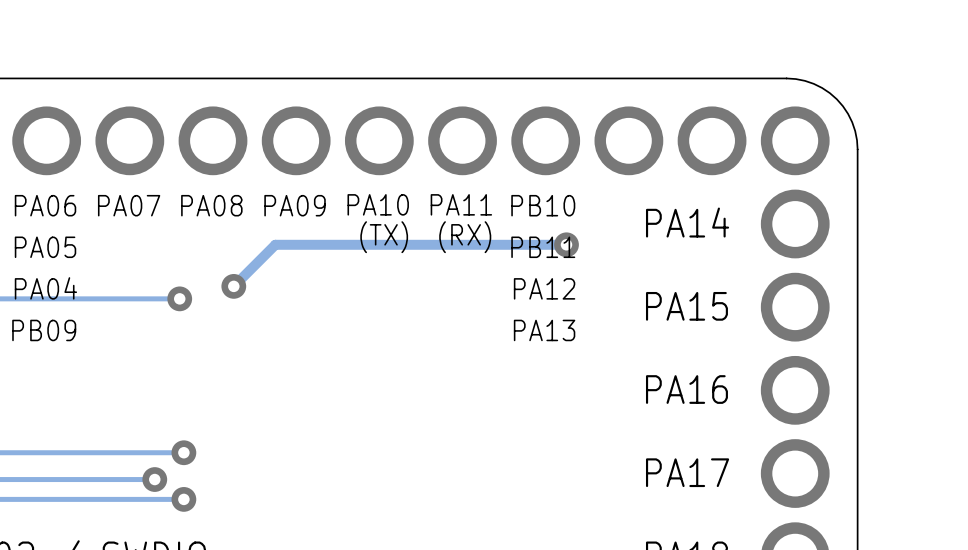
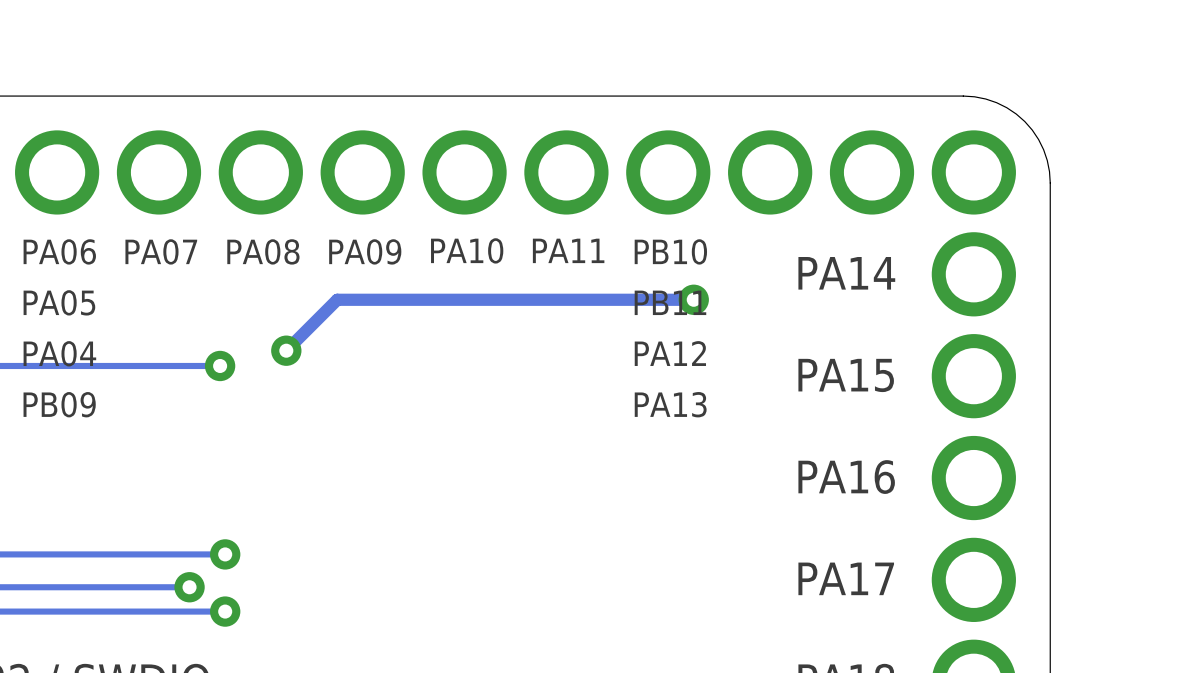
text: (TX) (384, 237) -> none
text: (RX) (465, 237) -> none

